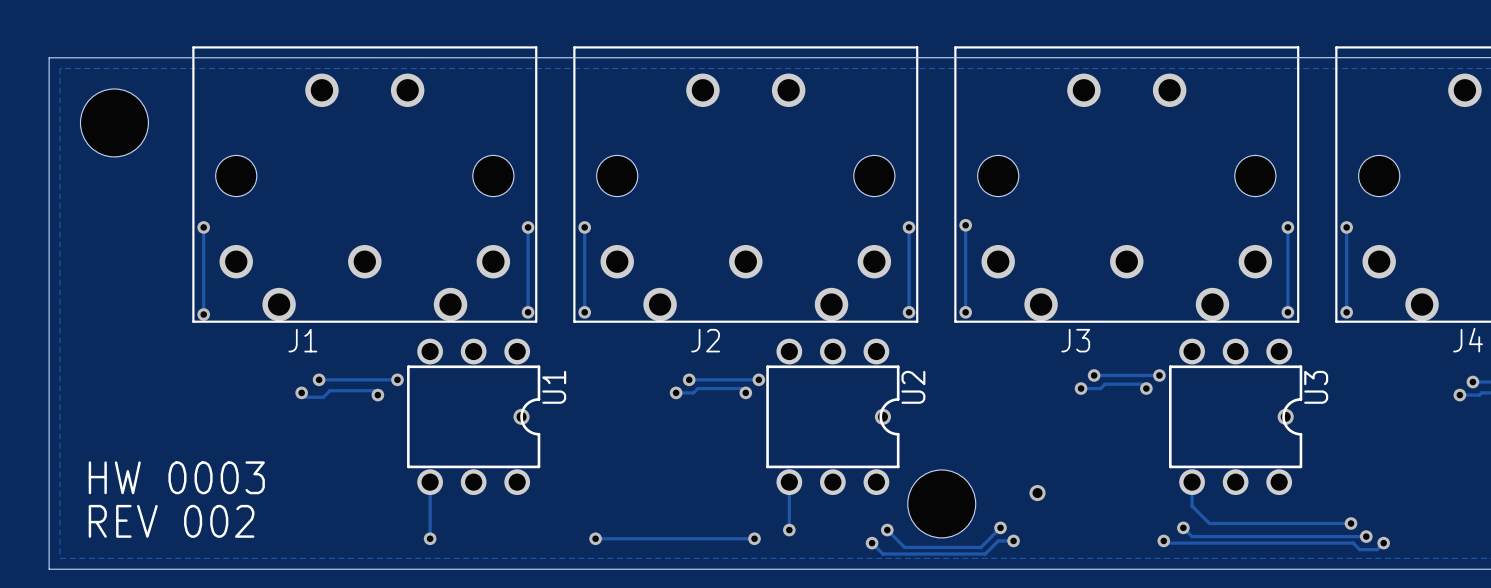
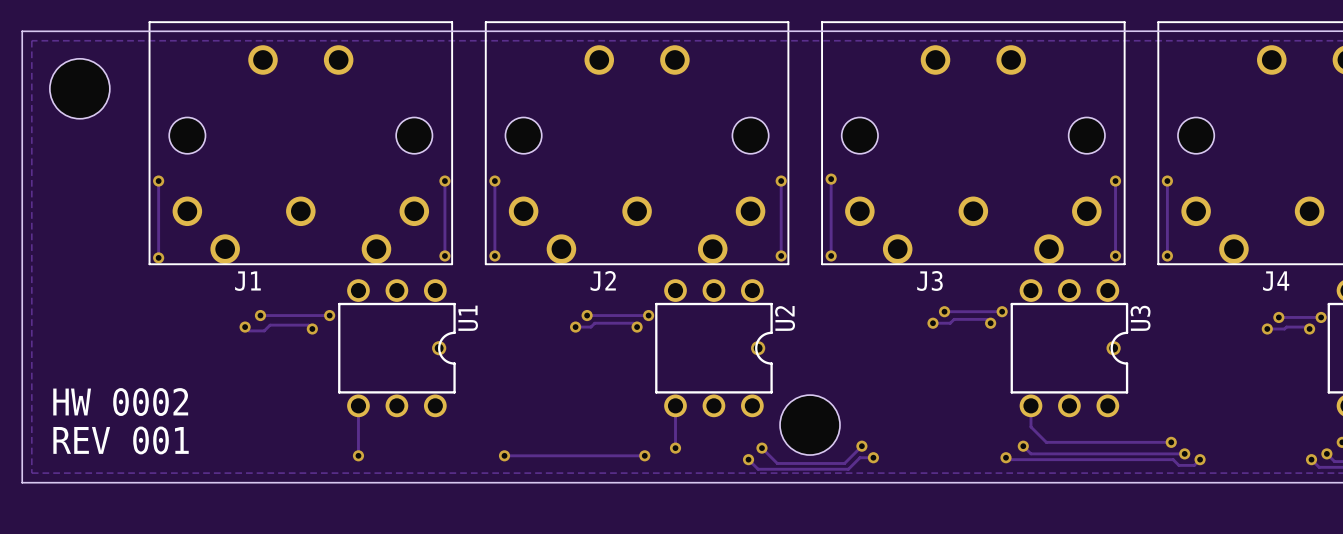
text: HW 0003 (176, 477) -> HW 0002 (120, 402)
via: (1037, 493) -> none
text: REV 002 (171, 521) -> REV 001 (121, 440)

